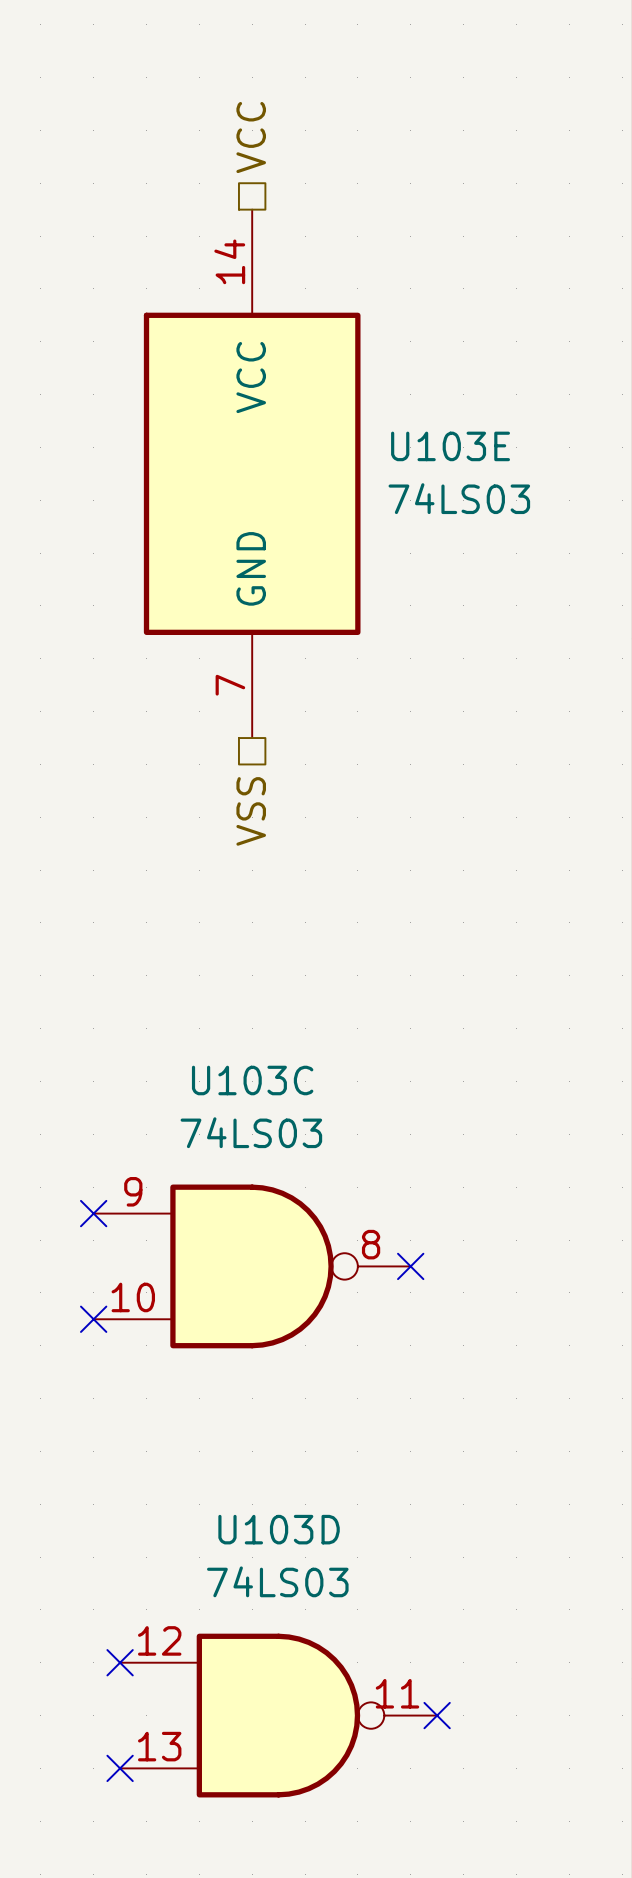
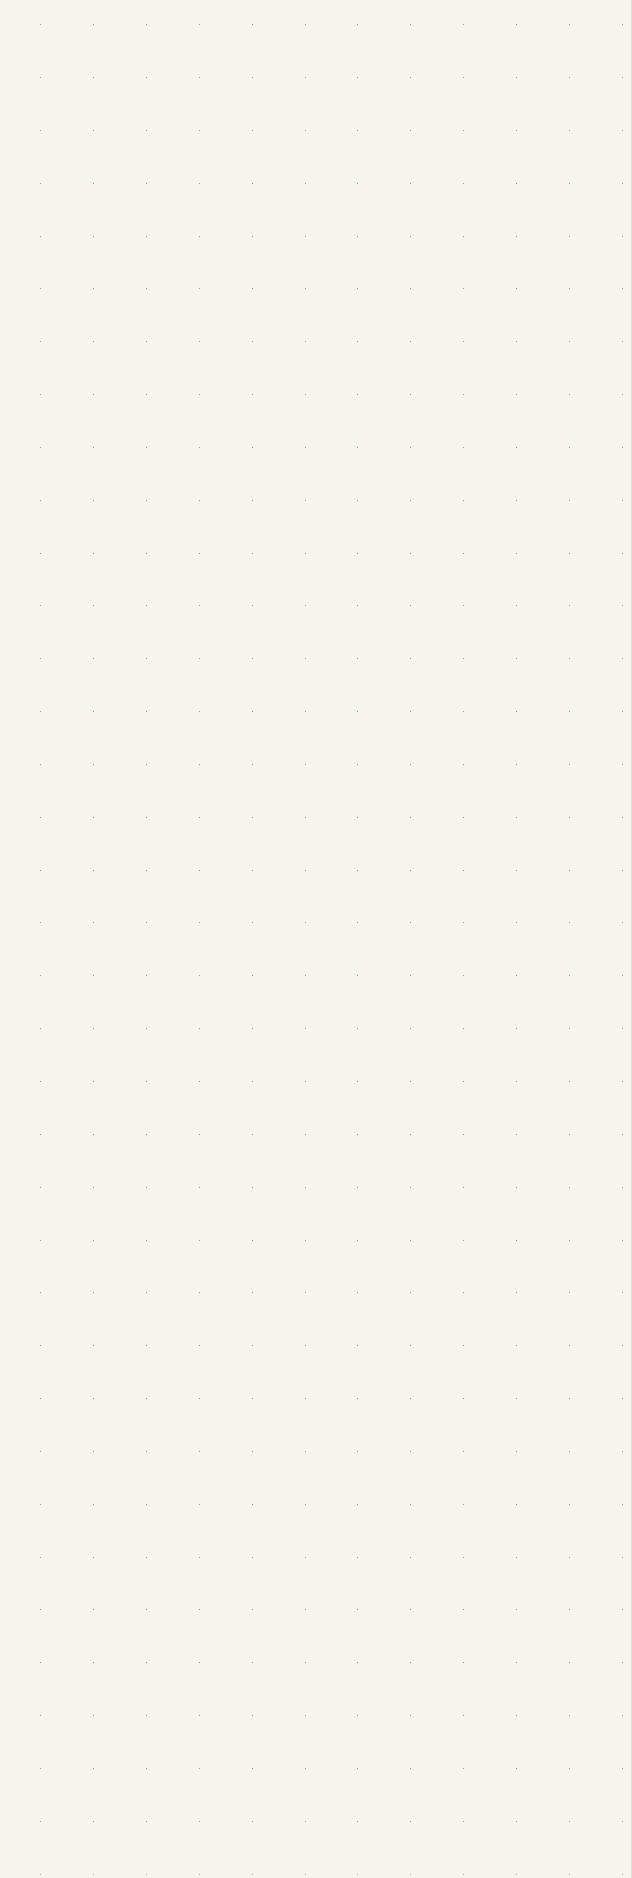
hierarchical label: VCC (251, 137) -> none
U103E: 74LS03 (252, 473) -> none
hierarchical label: VSS (251, 811) -> none
no-connect mark: (93, 1213) -> none
U103C: 74LS03 (252, 1266) -> none
no-connect mark: (410, 1266) -> none
no-connect mark: (93, 1319) -> none
no-connect mark: (120, 1662) -> none
U103D: 74LS03 (278, 1715) -> none
no-connect mark: (437, 1715) -> none
no-connect mark: (120, 1768) -> none

